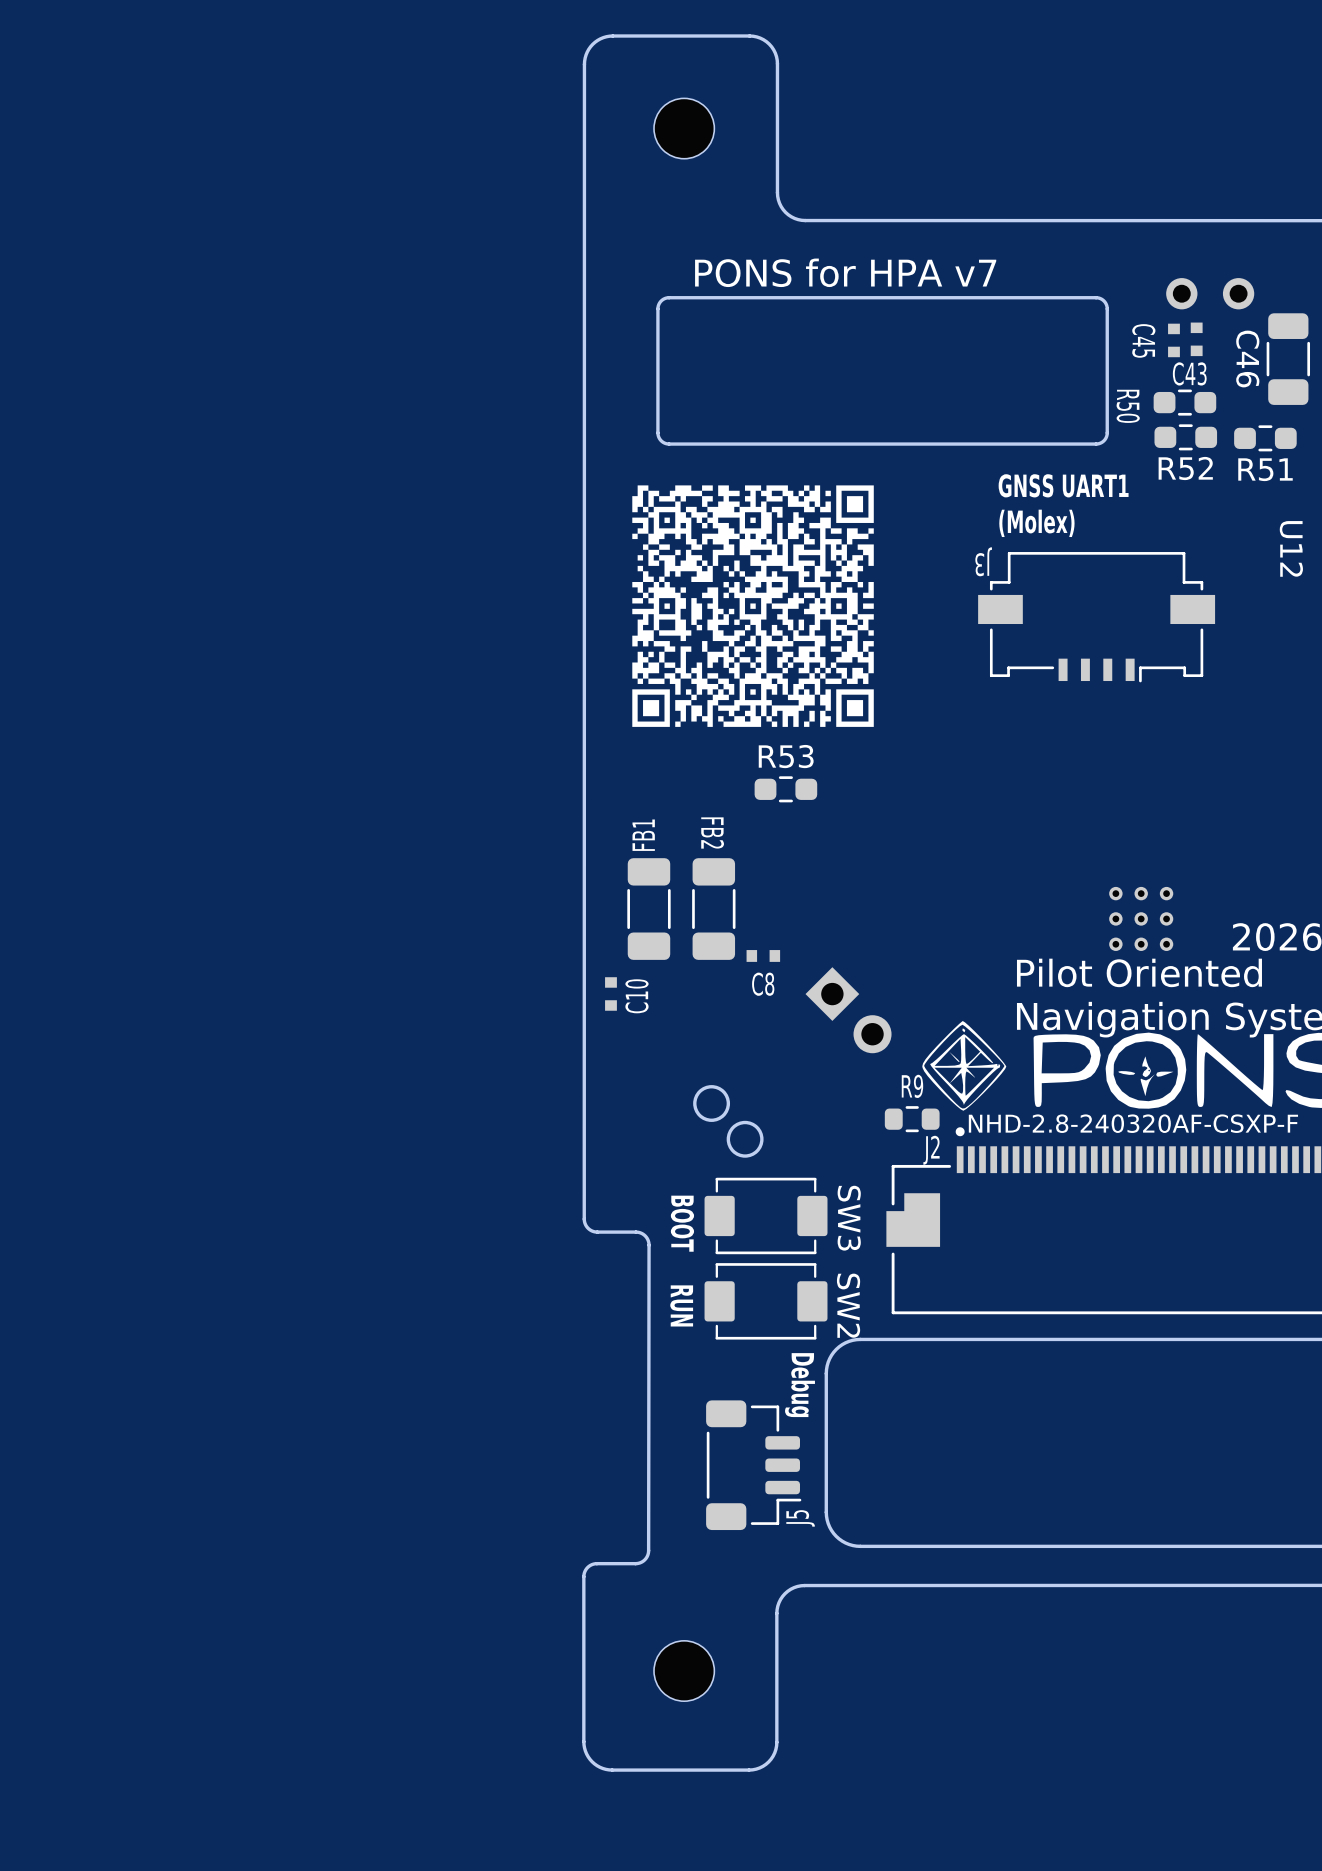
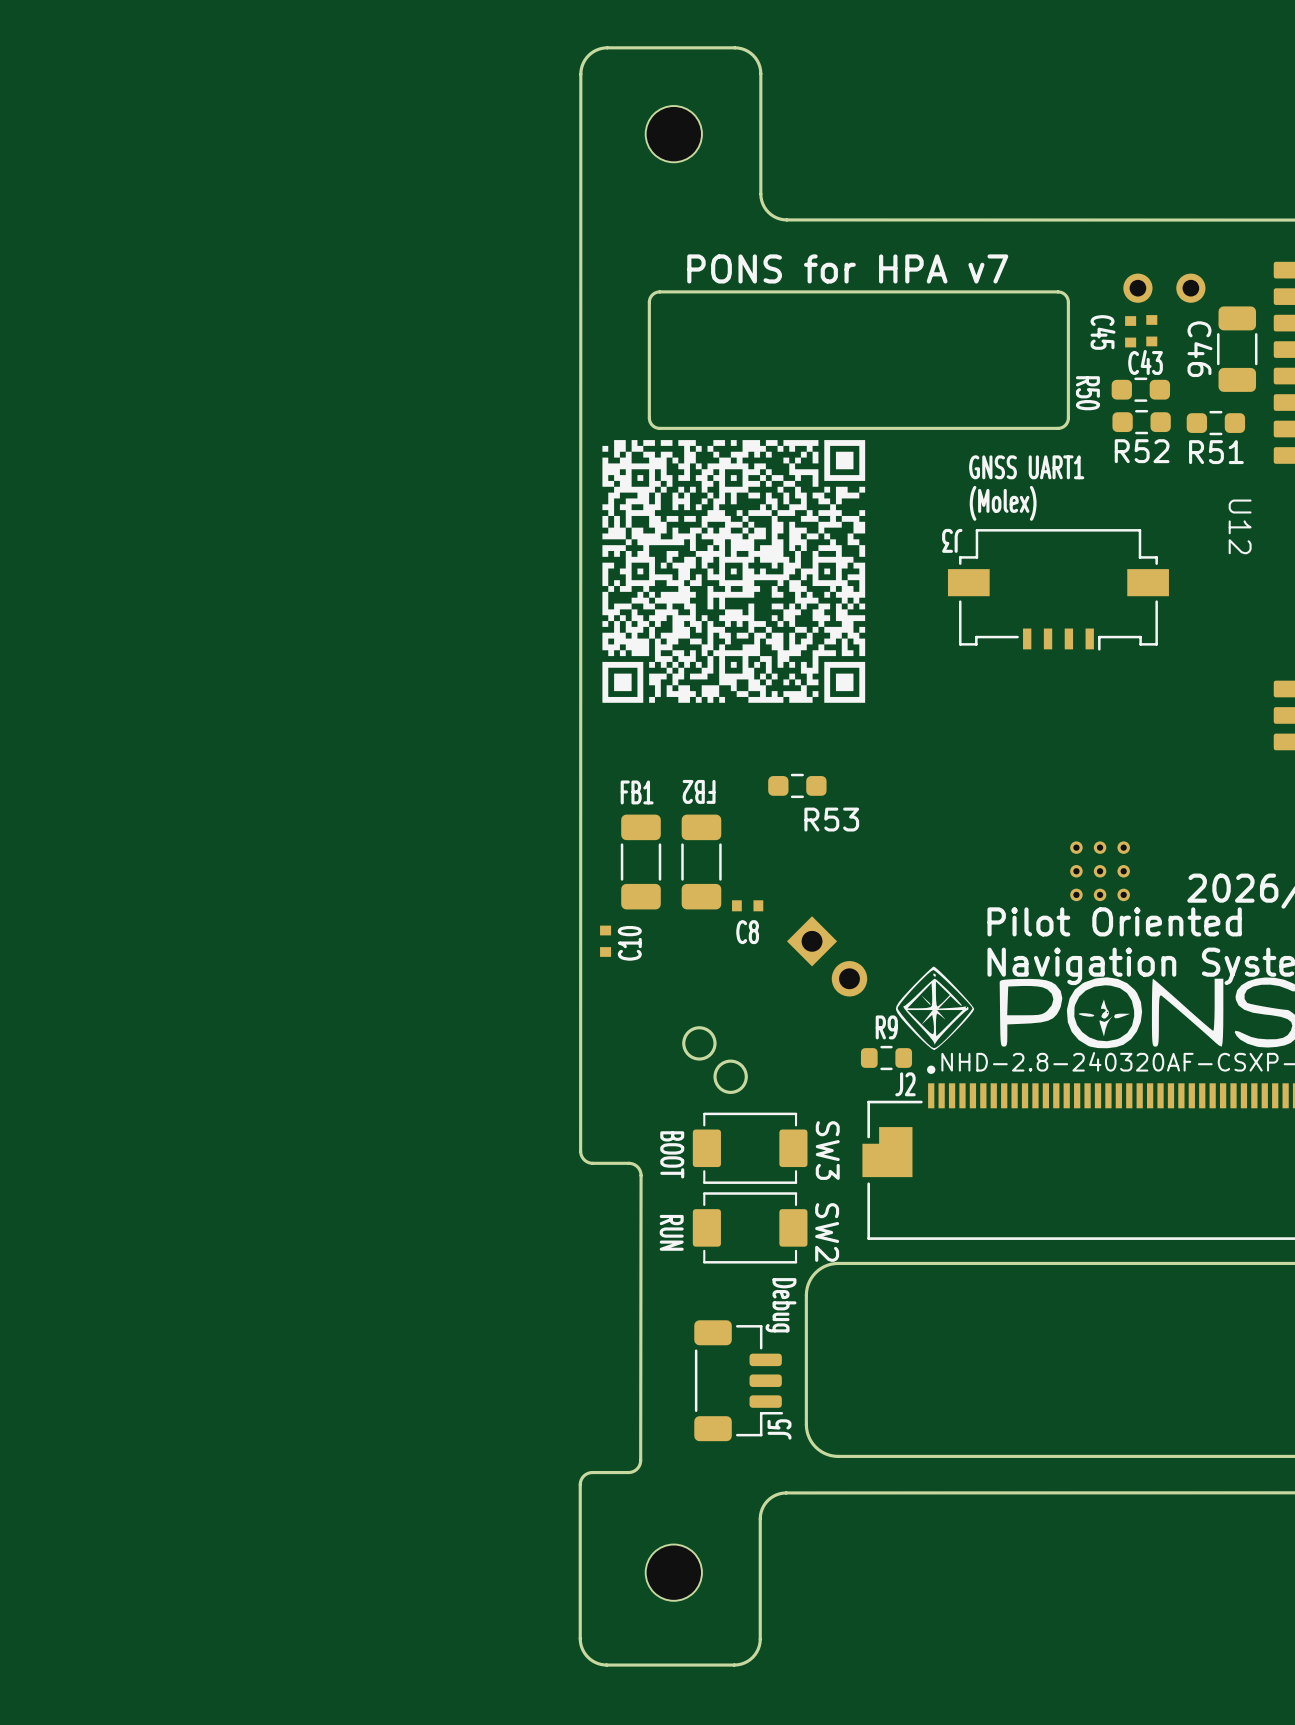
drawing shape: [632, 485, 874, 727] -> [602, 440, 866, 703]
R53 name position: R53 (786, 756) -> R53 (831, 819)
R53 position: (785, 789) -> (797, 785)
FB2 name rotation: 0° (712, 833) -> 90° clockwise (699, 791)
FB1 name rotation: 0° (643, 835) -> 90° clockwise (637, 792)

